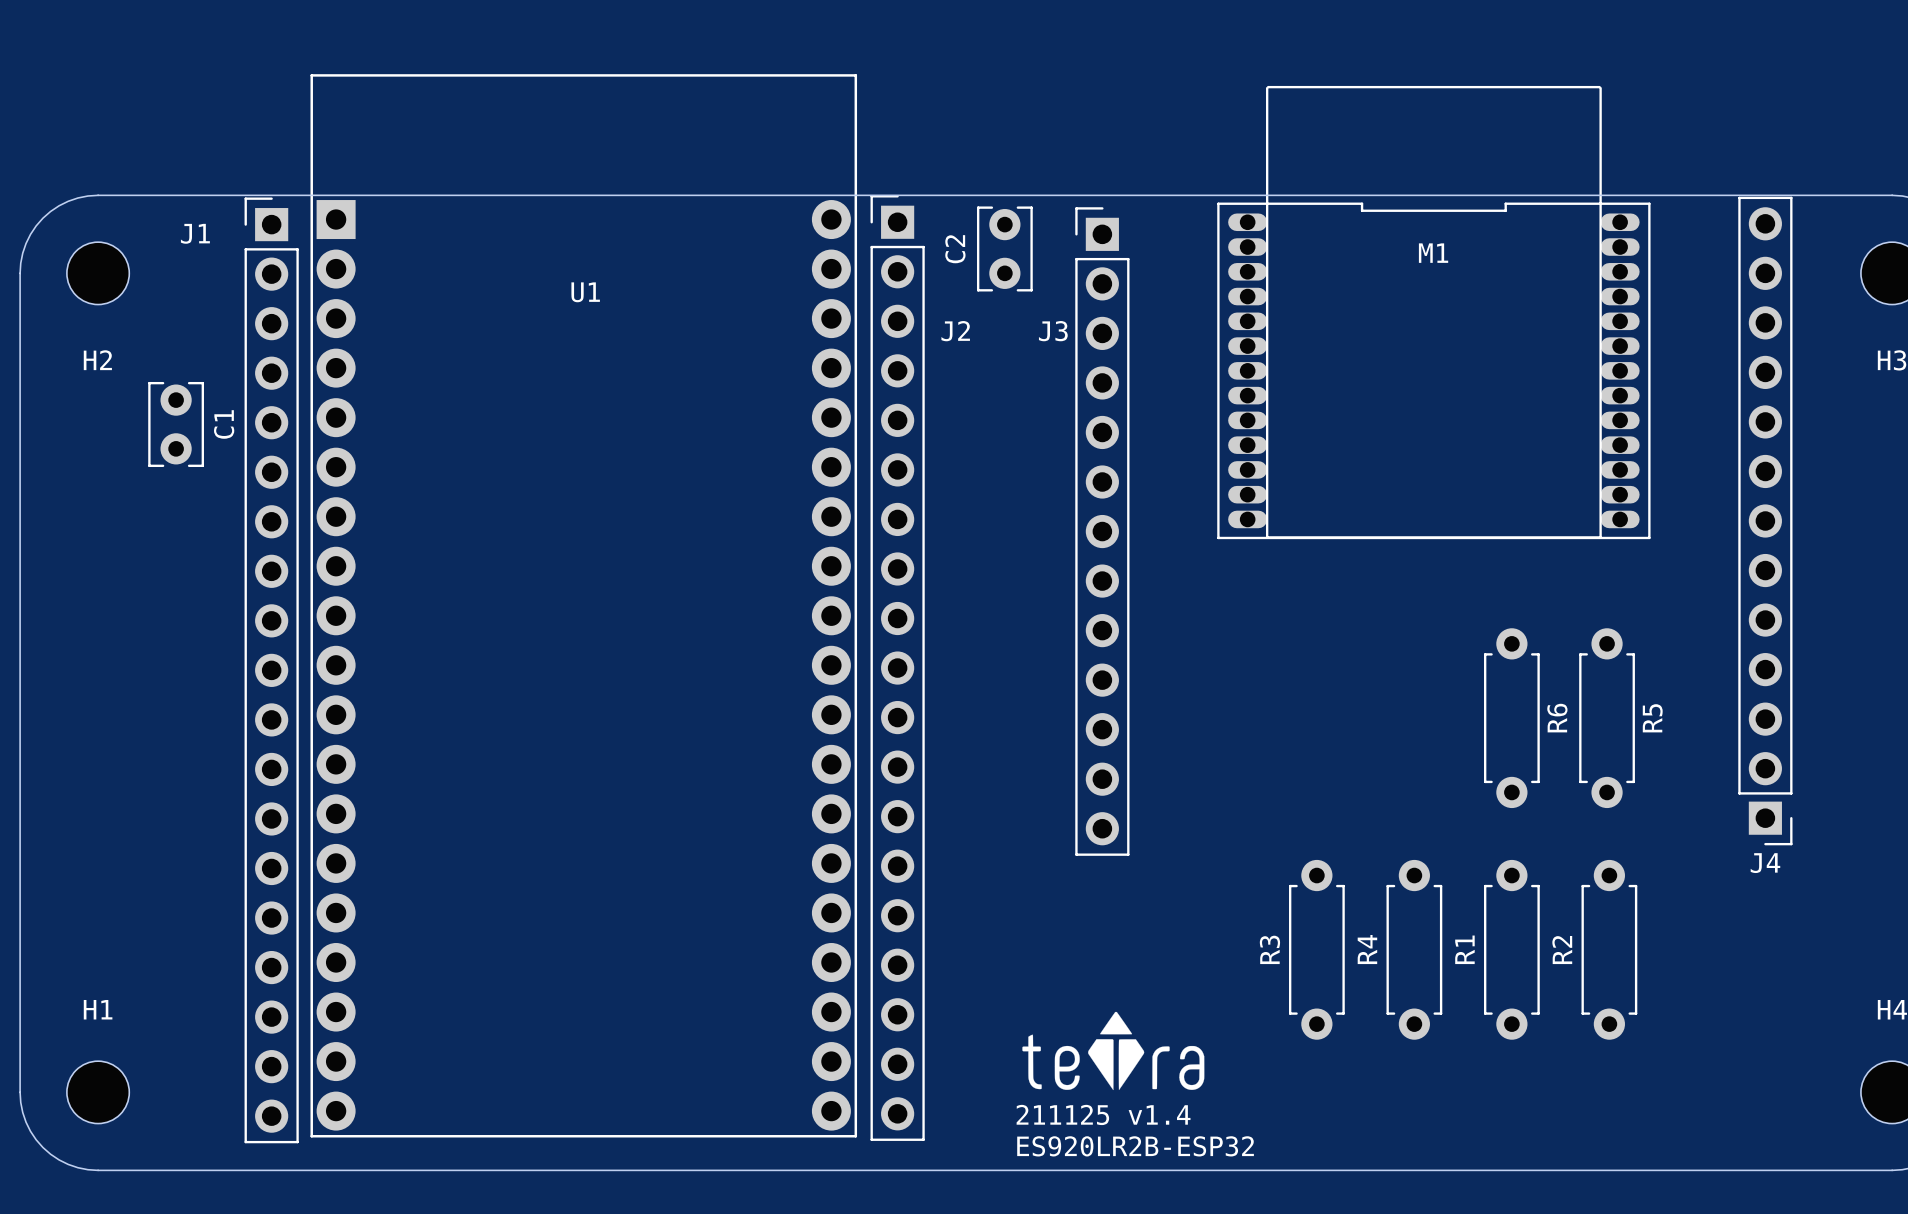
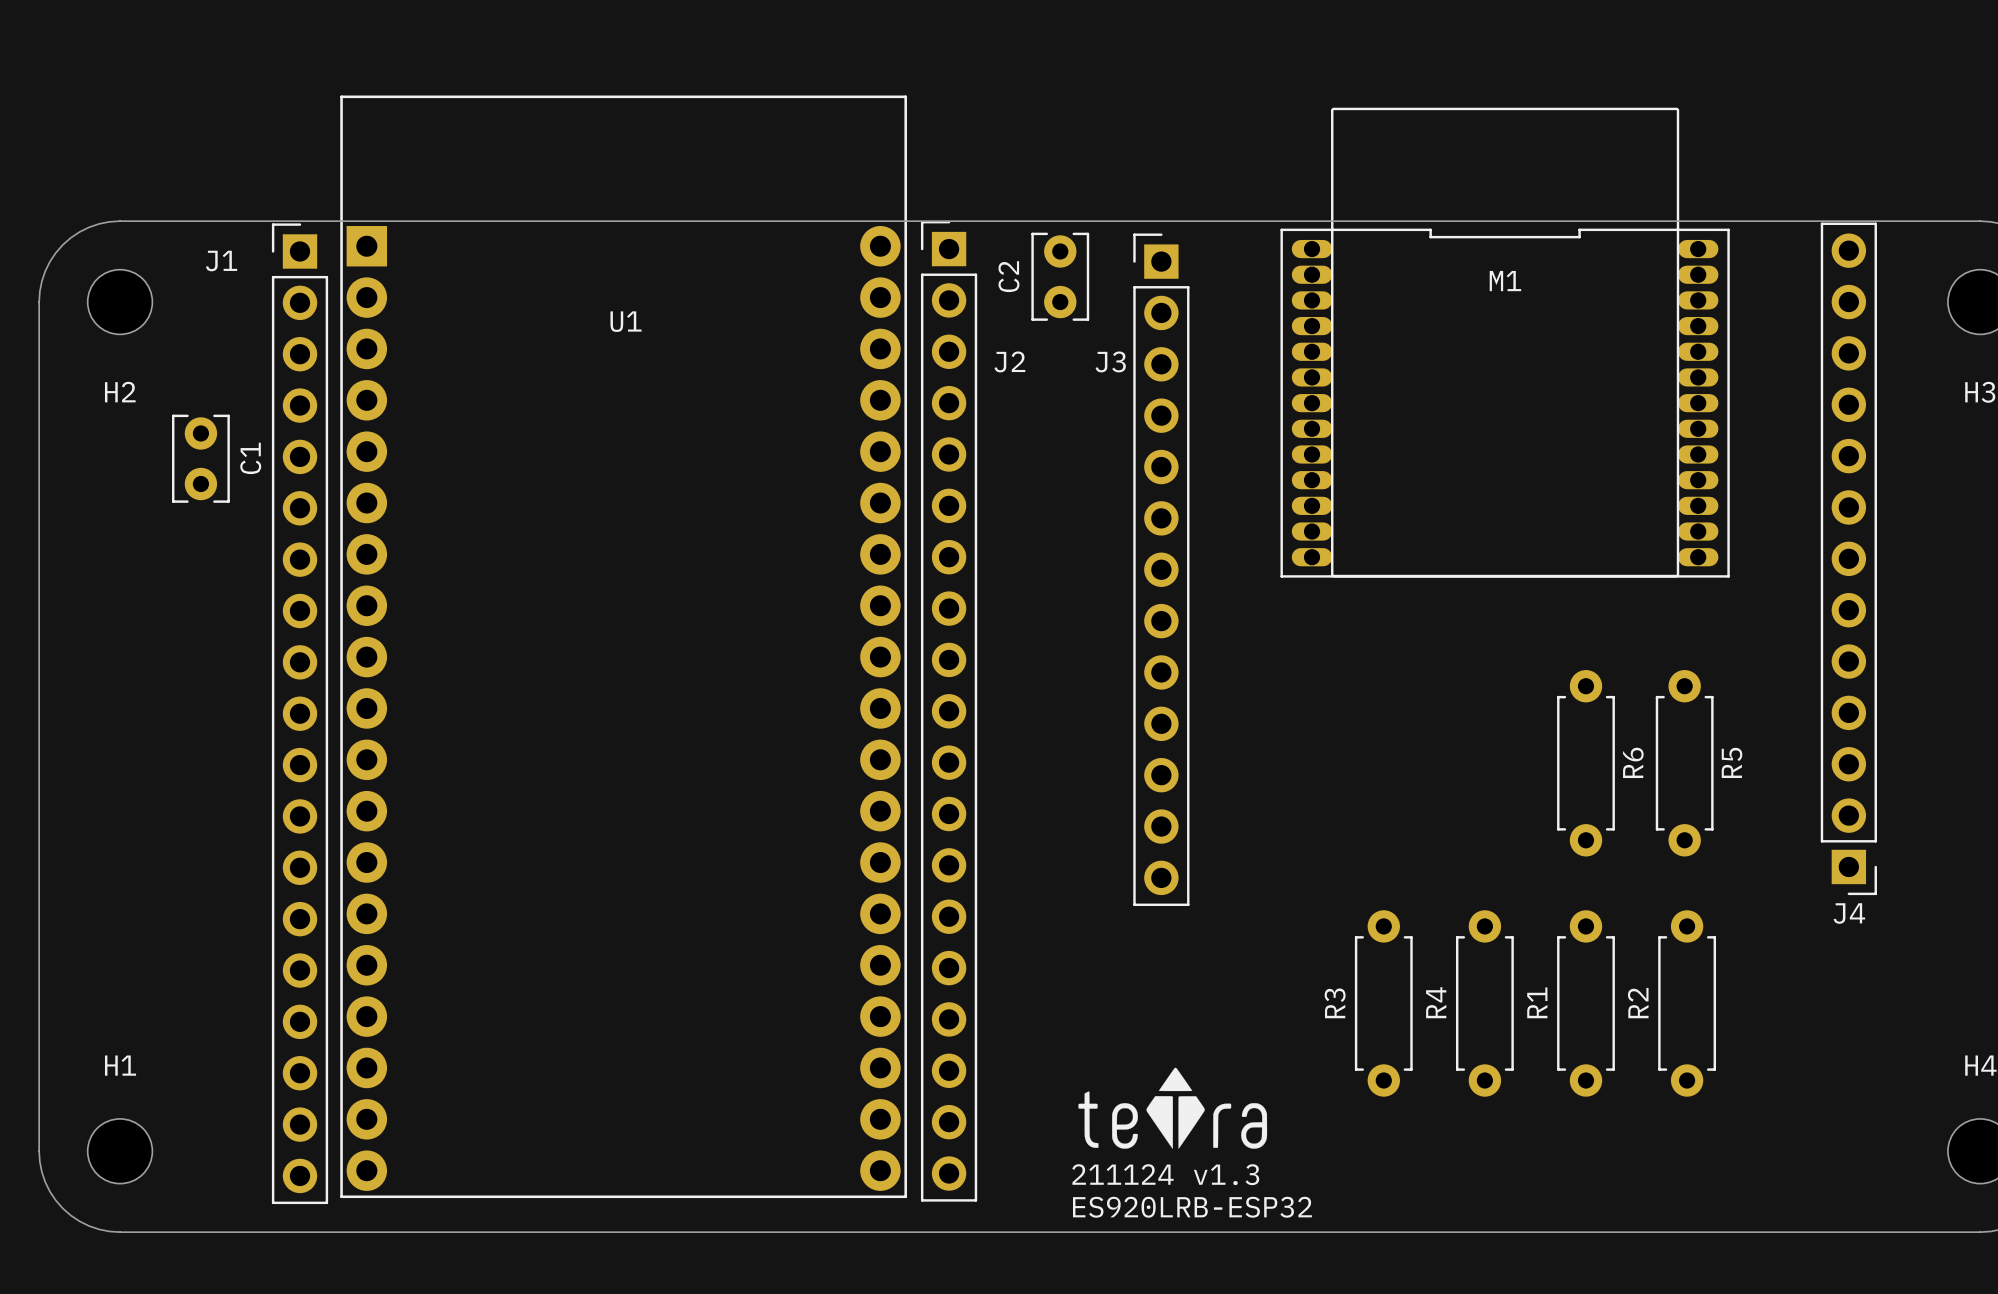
text: 211125 v1.4 (1103, 1114) -> 211124 v1.3 (1165, 1174)
text: ES920LR2B-ESP32 (1135, 1146) -> ES920LRB-ESP32 (1192, 1207)

